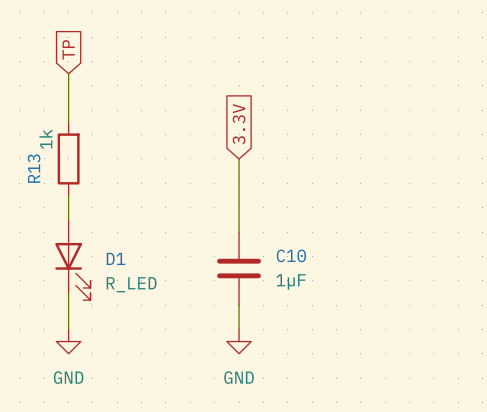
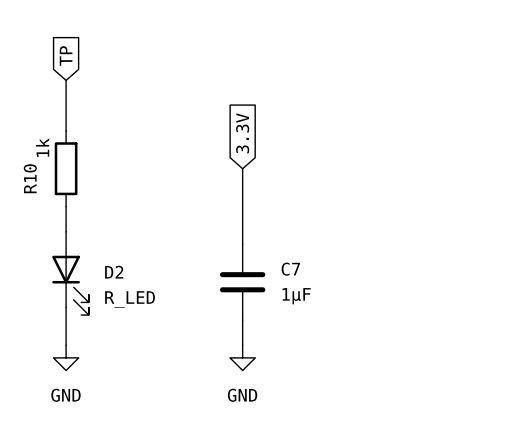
R13 name: R13 (34, 168) -> R10 (30, 178)
C10 name: C10 (291, 255) -> C7 (290, 269)
D1 name: D1 (116, 258) -> D2 (114, 272)

